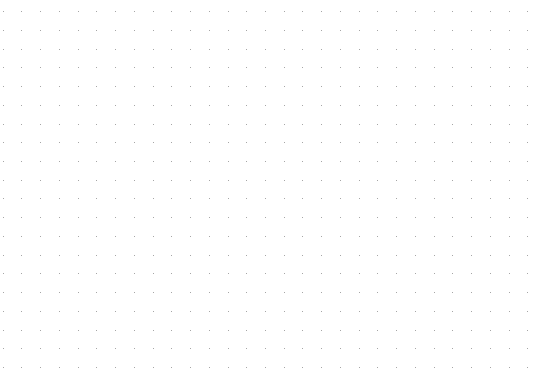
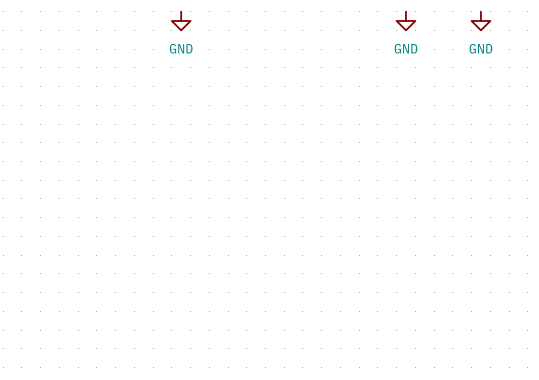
power symbol: none -> GND (181, 20)
power symbol: none -> GND (406, 20)
power symbol: none -> GND (480, 20)

